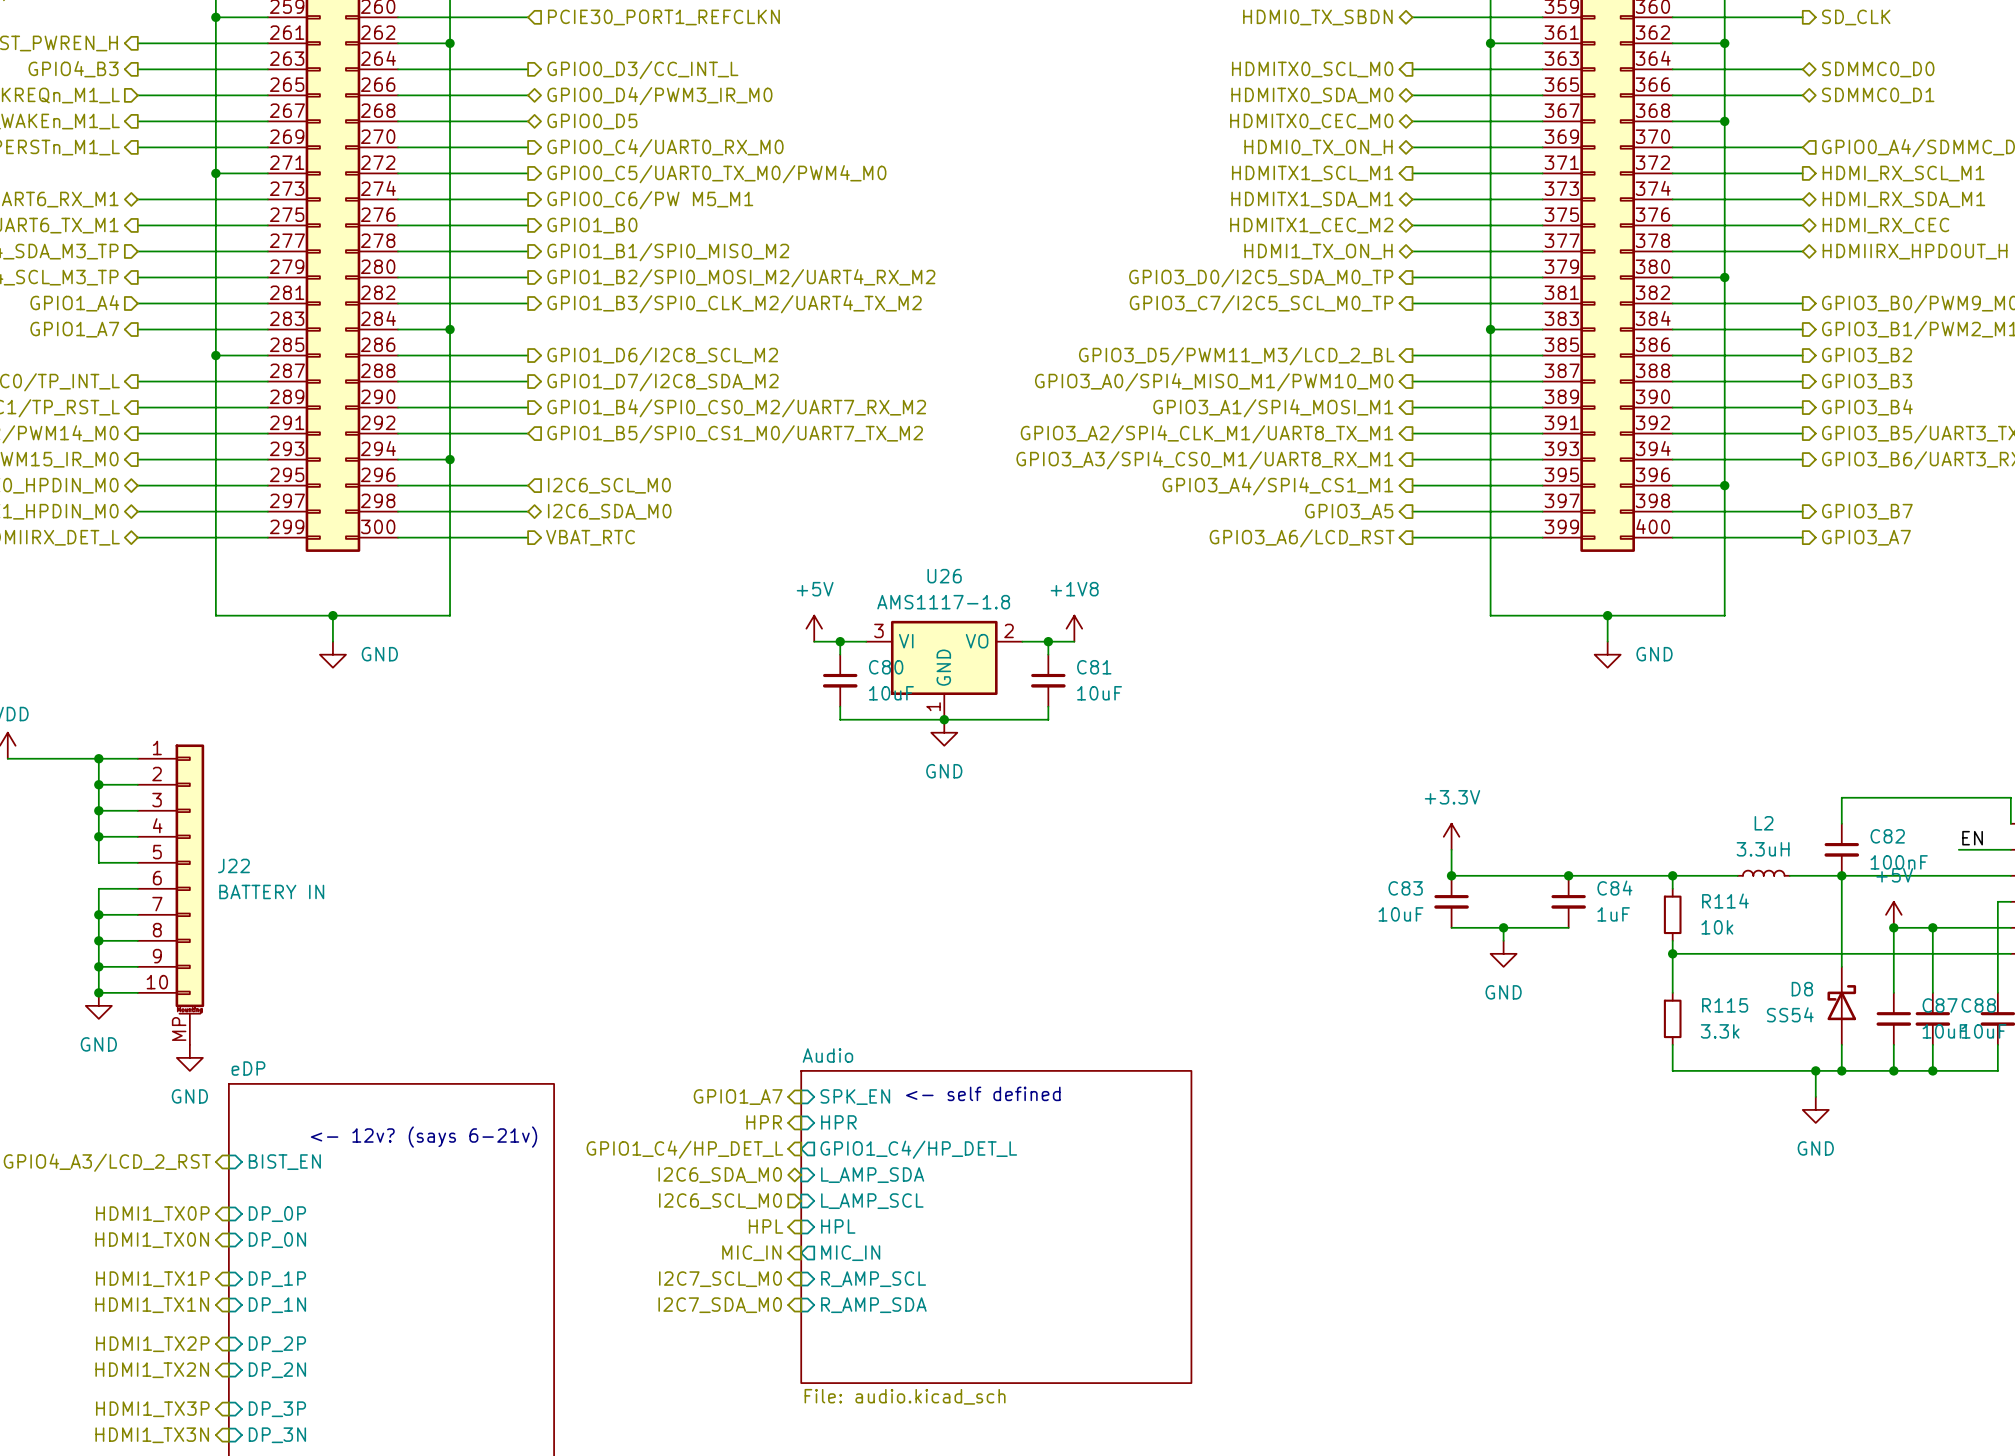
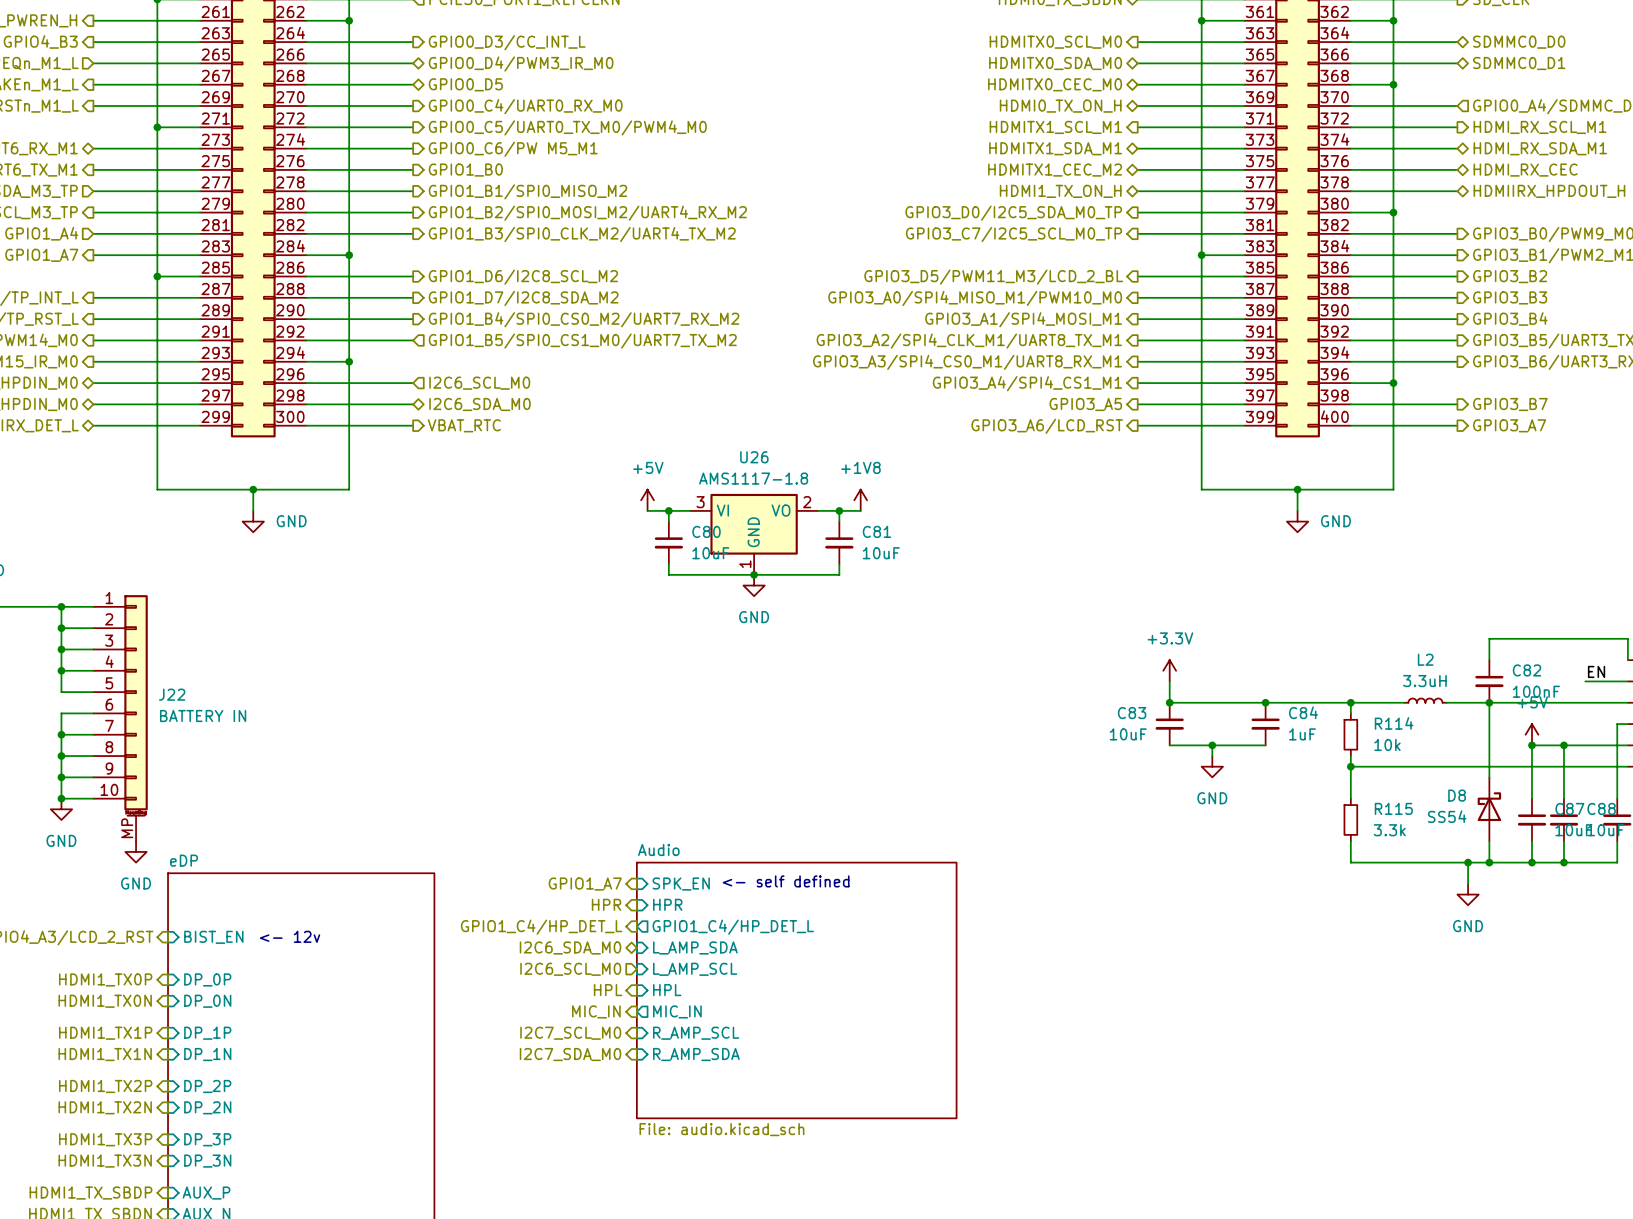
text: <- 12v? (says 6-21v) (424, 1137) -> none
text: none -> <- 12v (290, 936)

